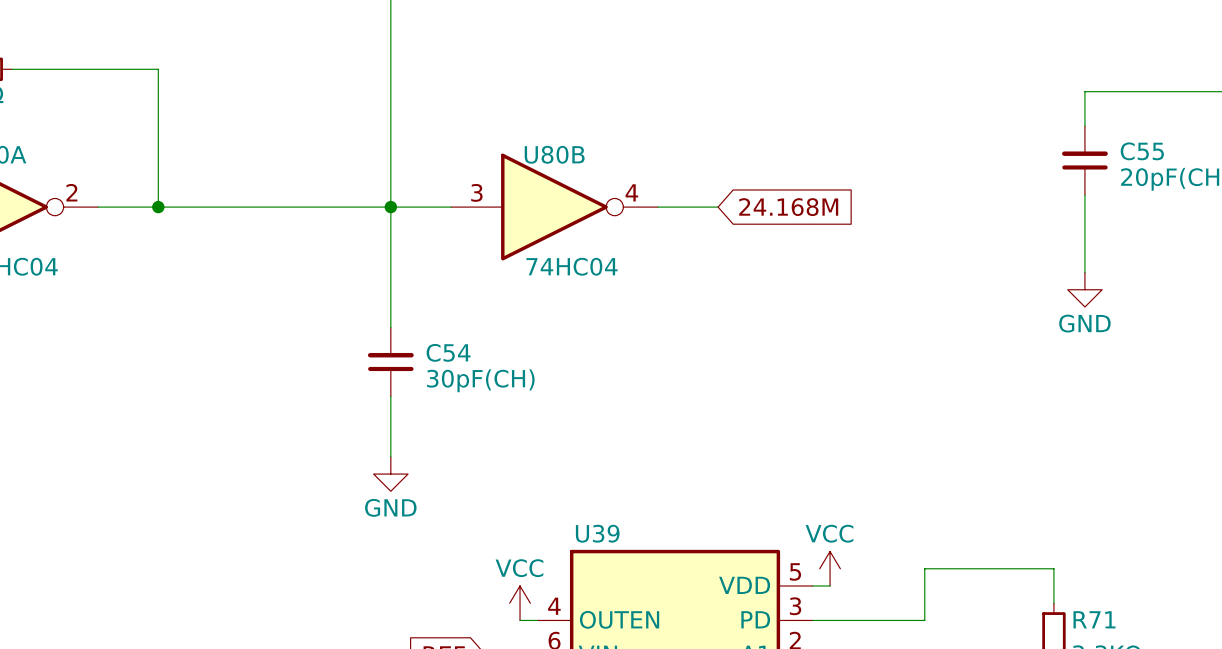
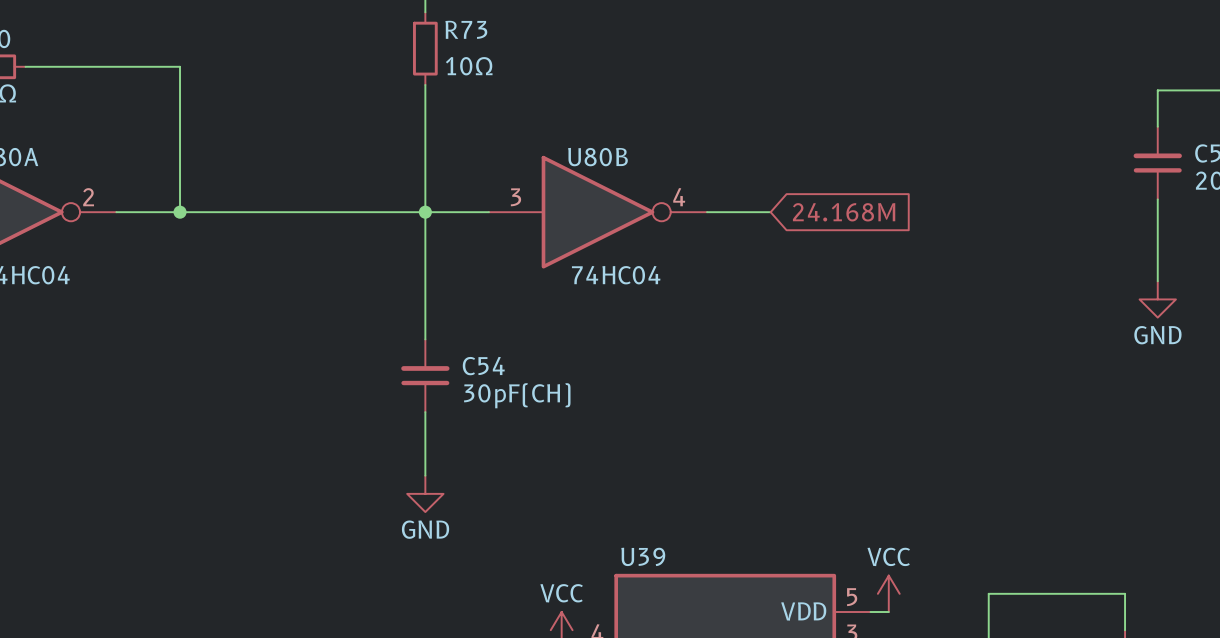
wire: (390, 17) (390, 86) -> none
R73: none -> 10Ω (425, 48)

